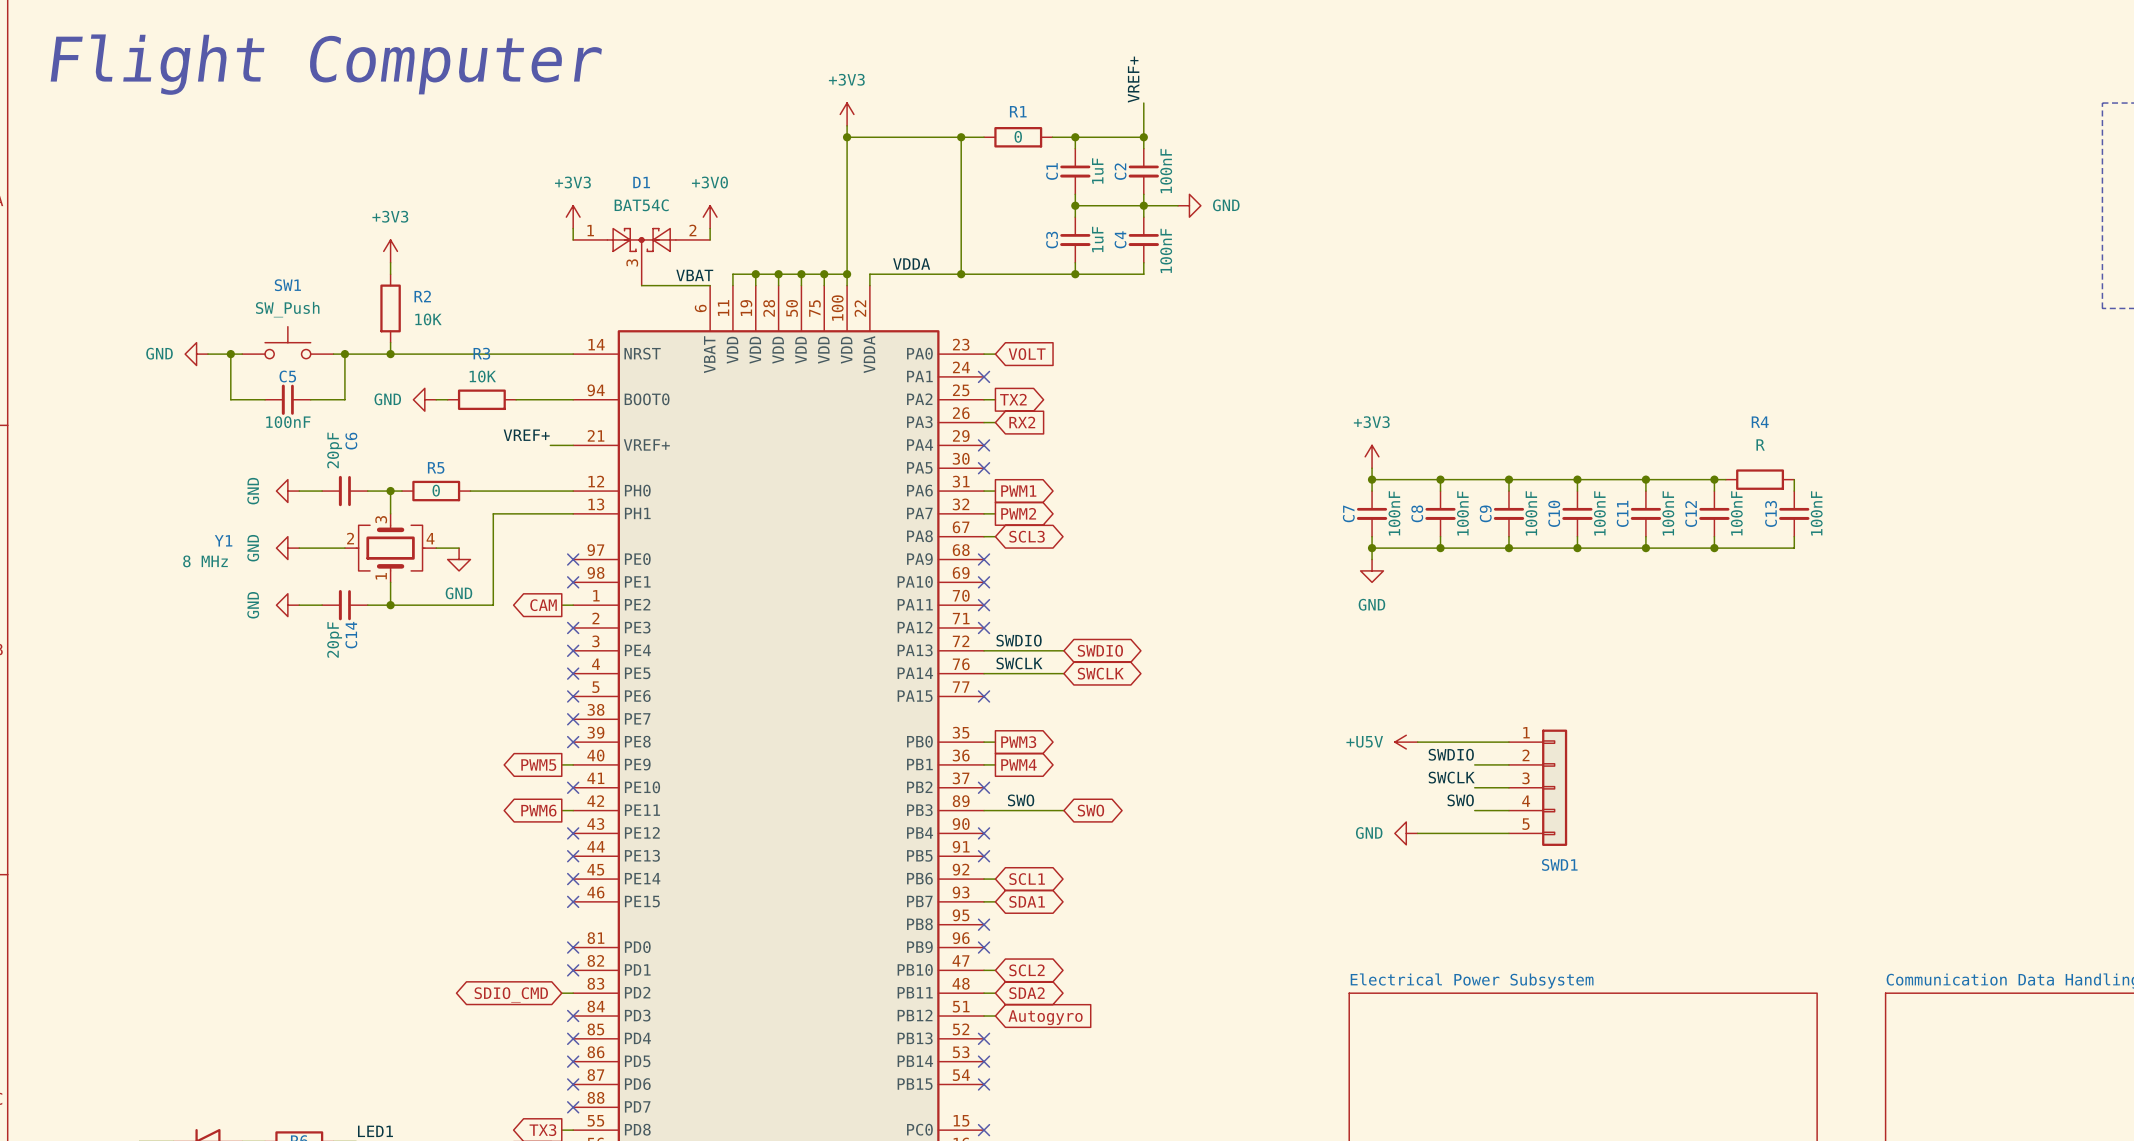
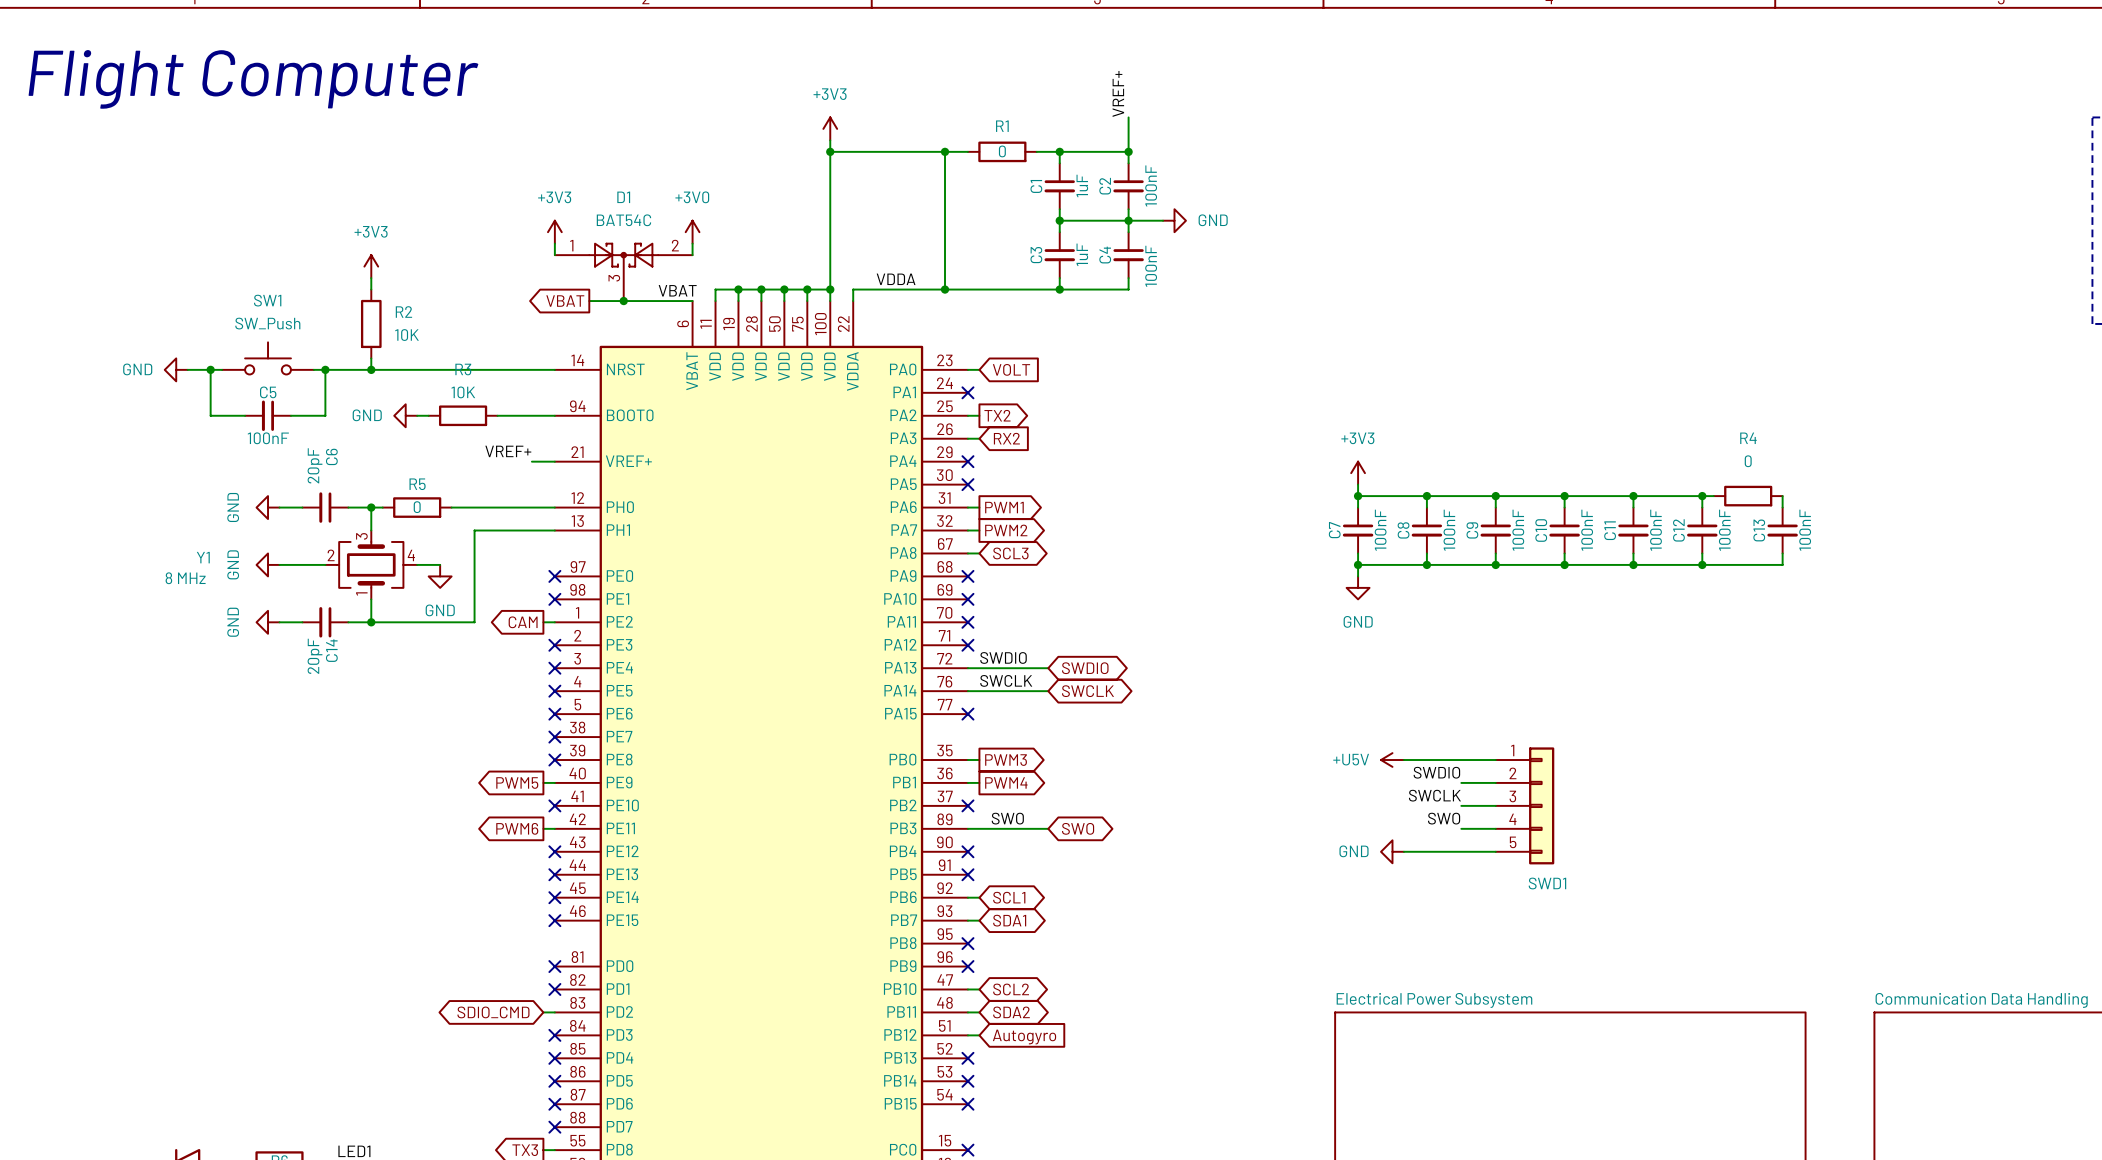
global label: none -> VBAT (565, 301)
wire: none -> (589, 301) (623, 301)
junction: none -> (623, 301)
R4 value: R (1760, 444) -> 0 (1748, 461)

